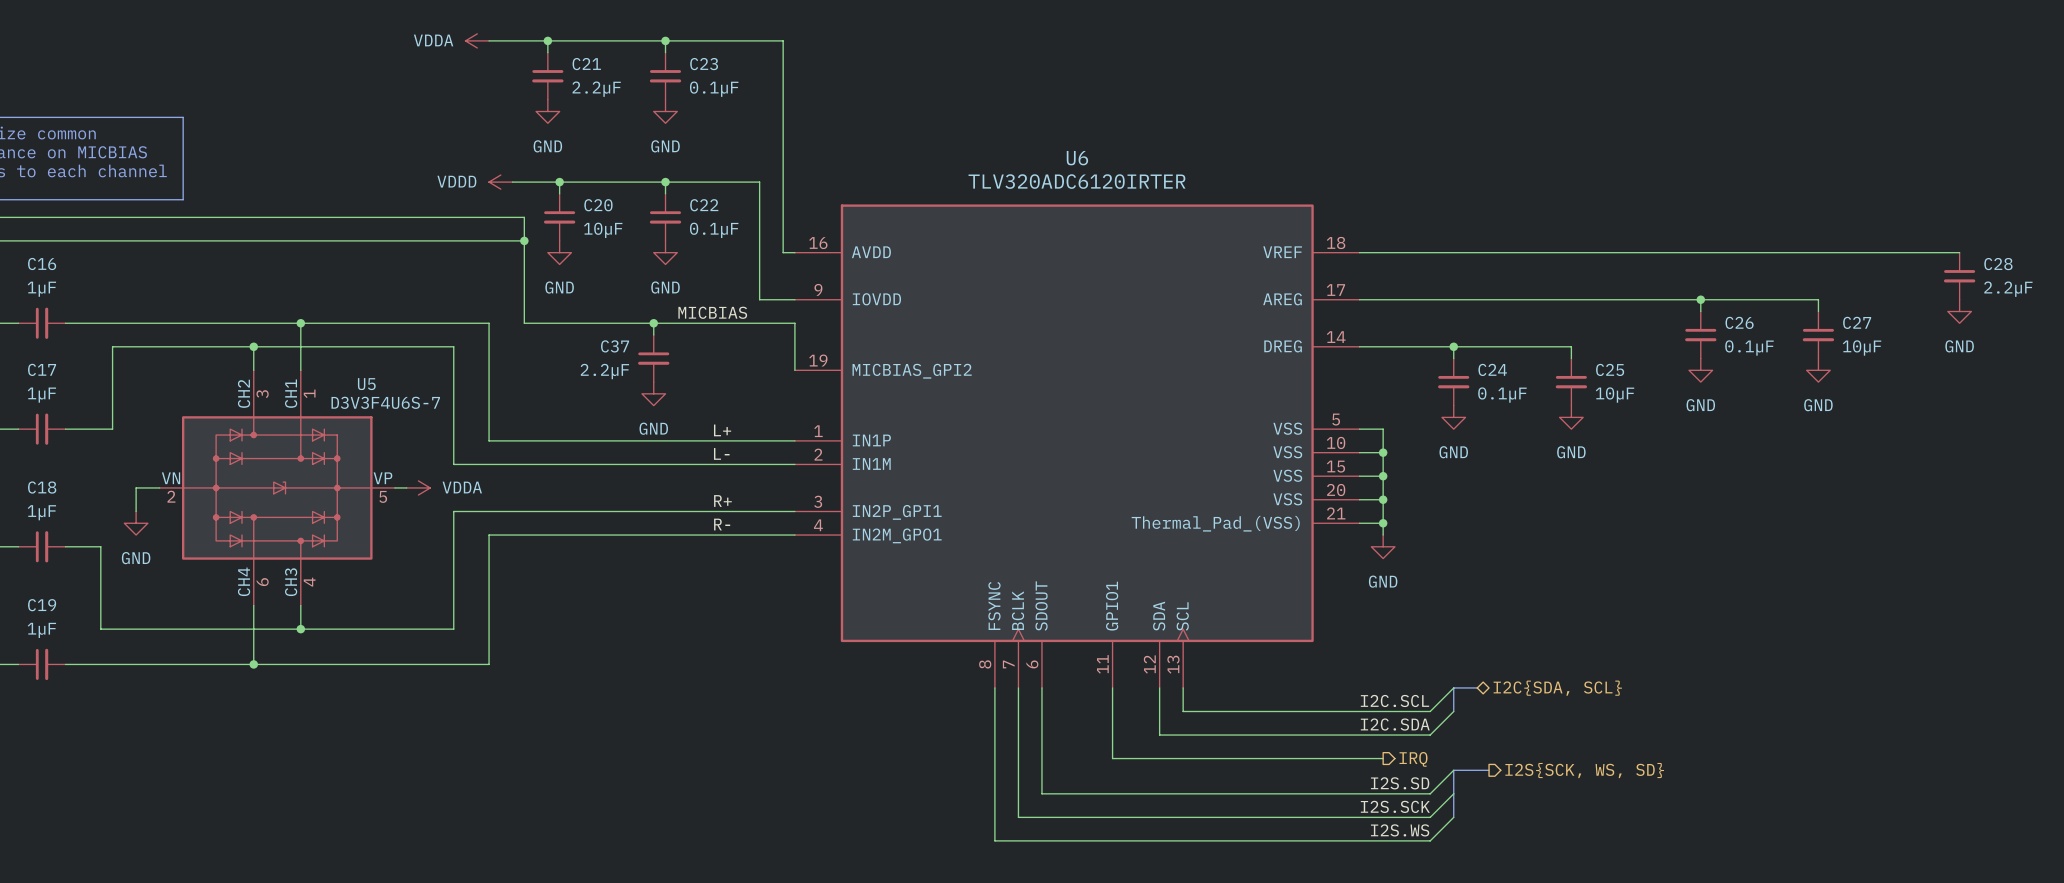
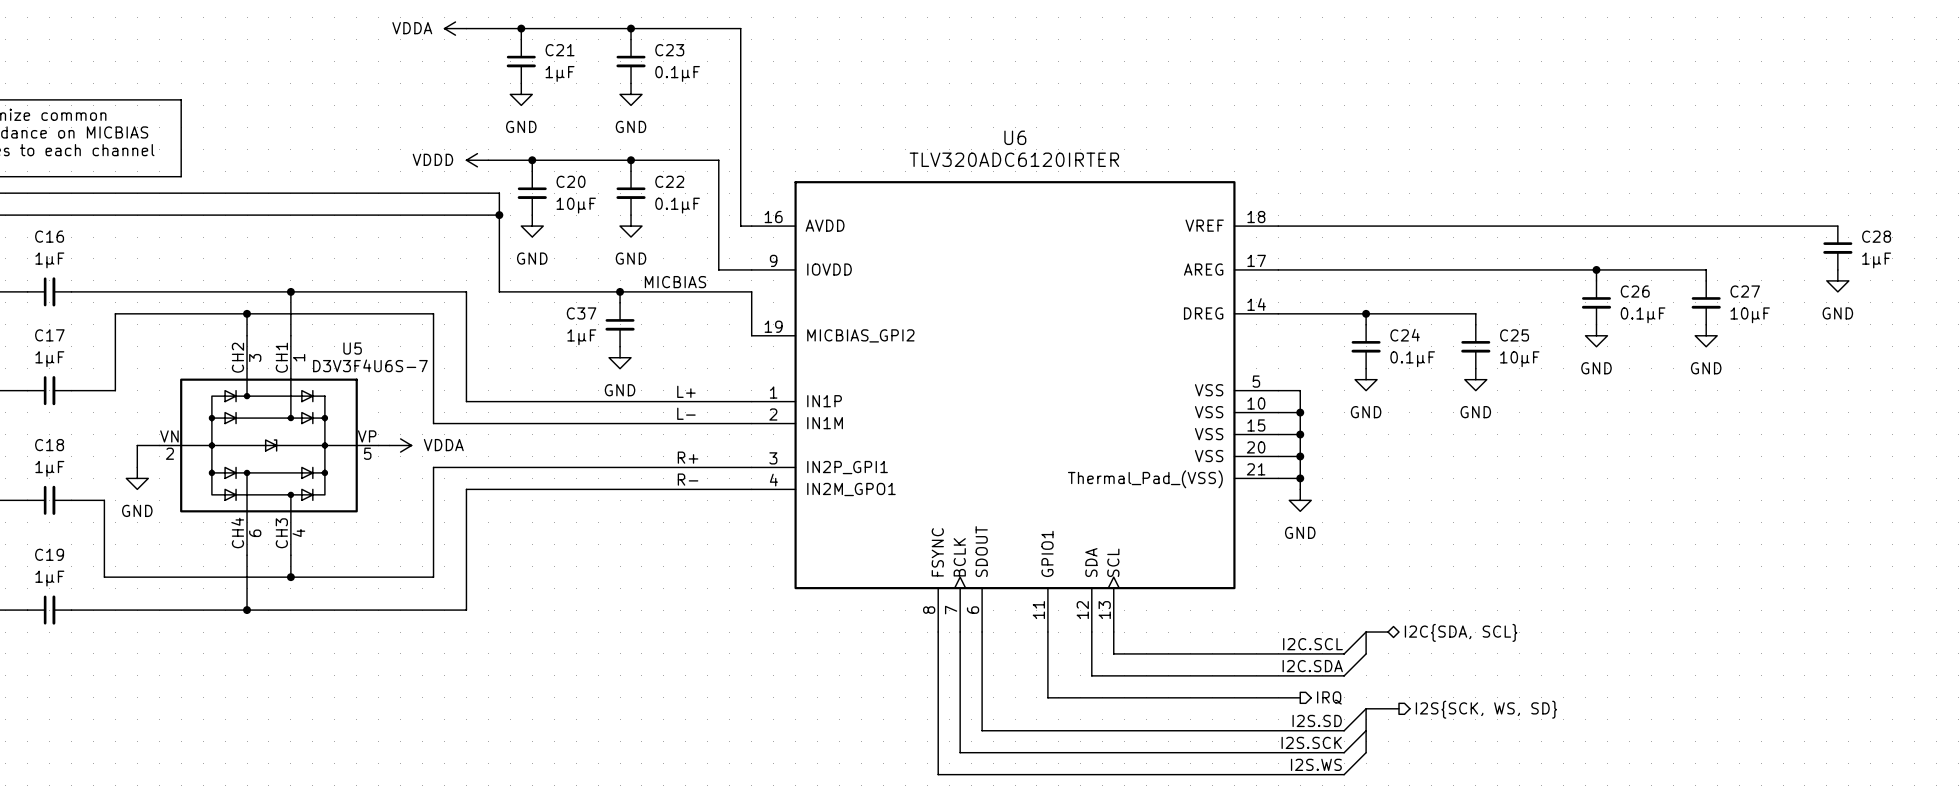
C21 value: 2.2µF (596, 89) -> 1µF (560, 73)
C28 value: 2.2µF (2008, 289) -> 1µF (1876, 260)
C37 value: 2.2µF (604, 371) -> 1µF (581, 337)

